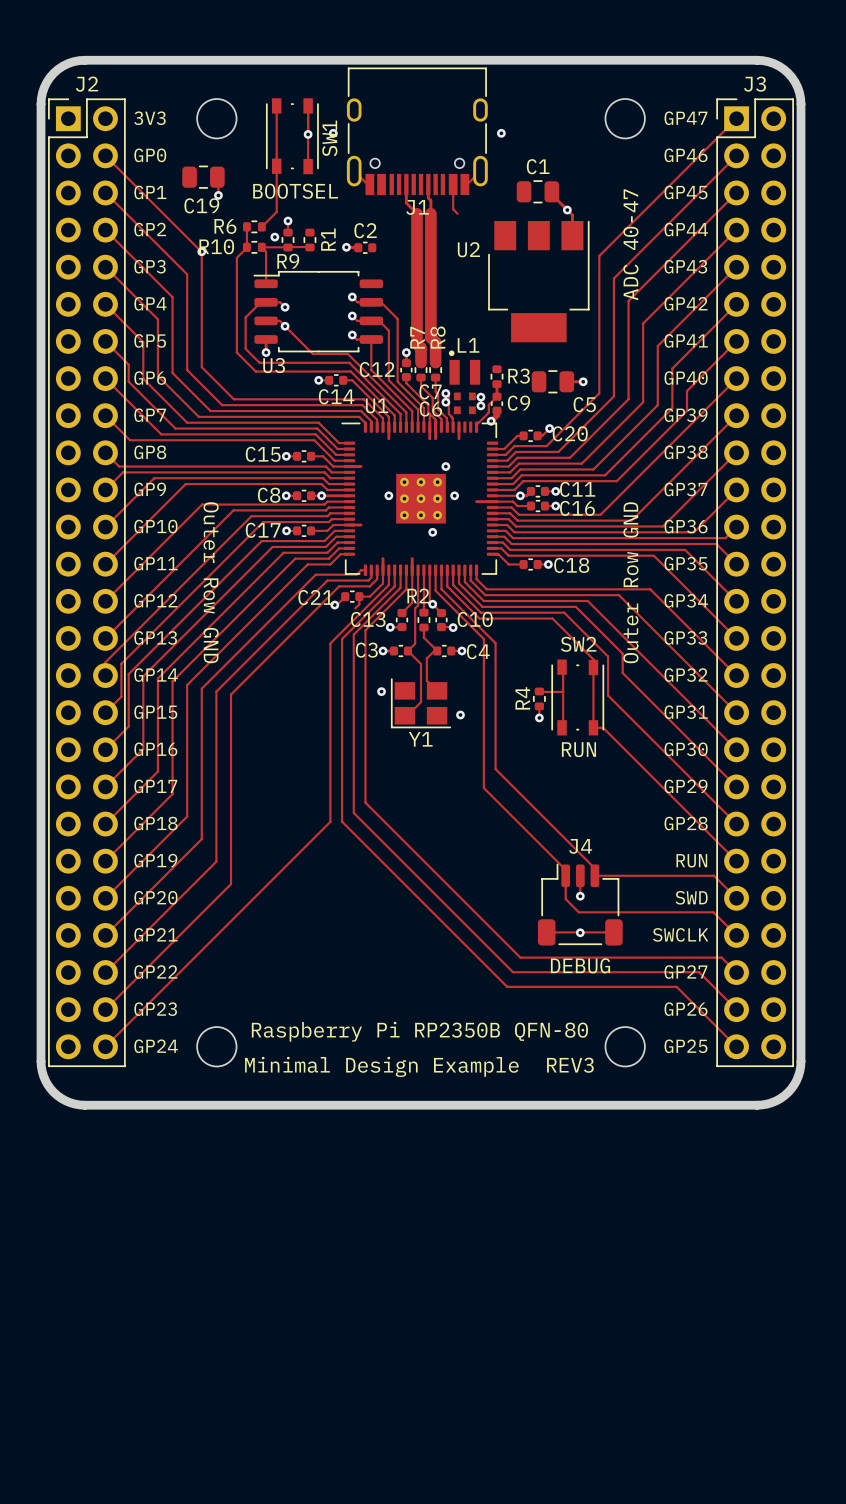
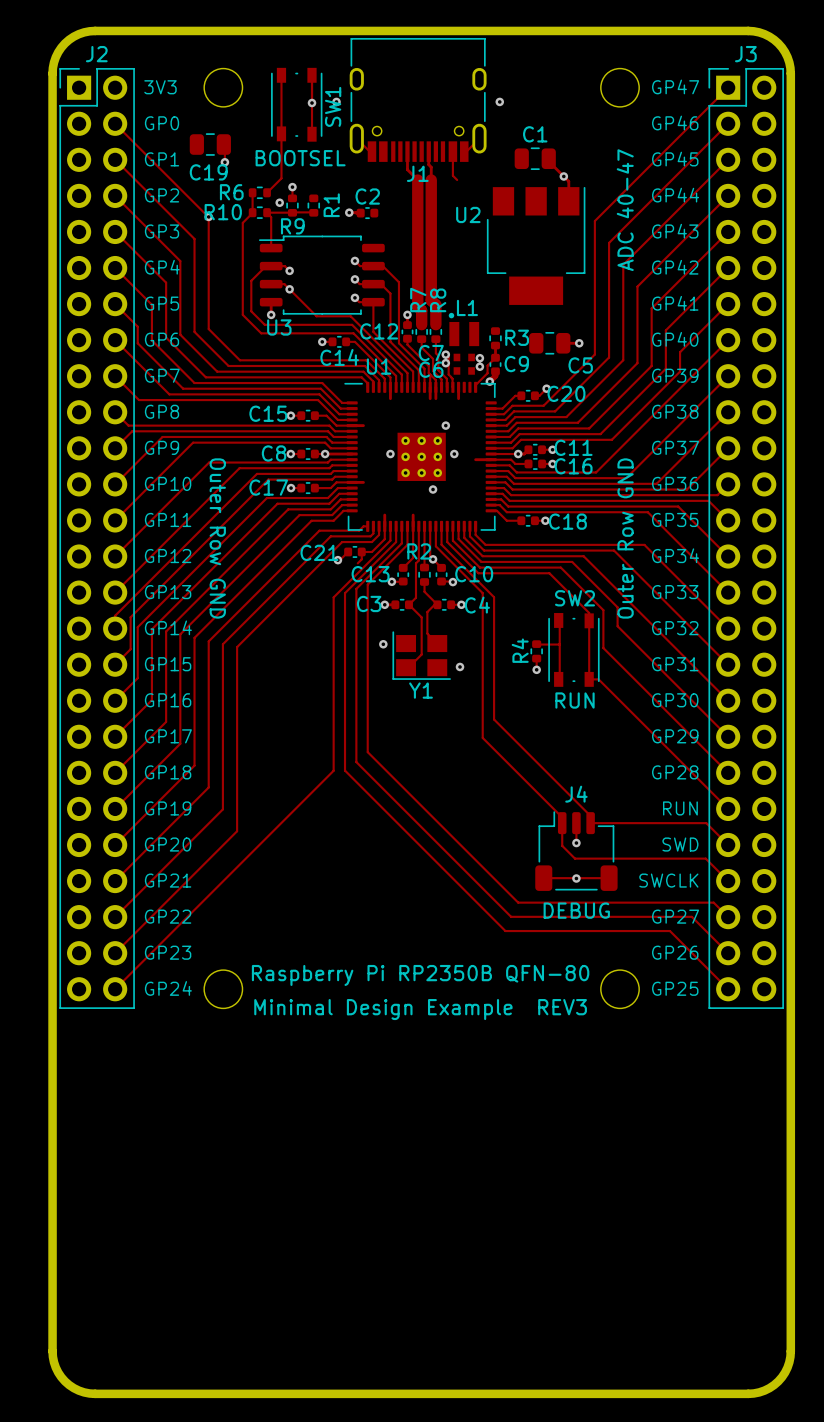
board edge: (41, 1061) (43, 1075) (53, 1092) (65, 1100) (84, 1105) (762, 1104) (780, 1098) (791, 1088) (798, 1075) (801, 1061) -> (52, 1003) (52, 1356) (58, 1372) (69, 1385) (84, 1392) (95, 1393) (748, 1393) (769, 1388) (785, 1372) (790, 1351) (790, 1003)

